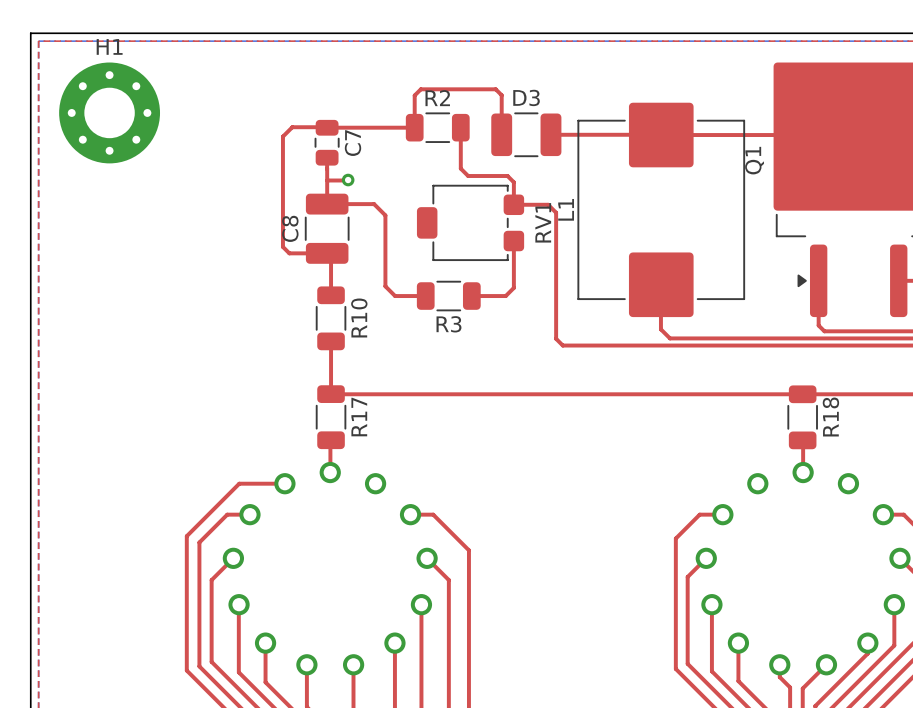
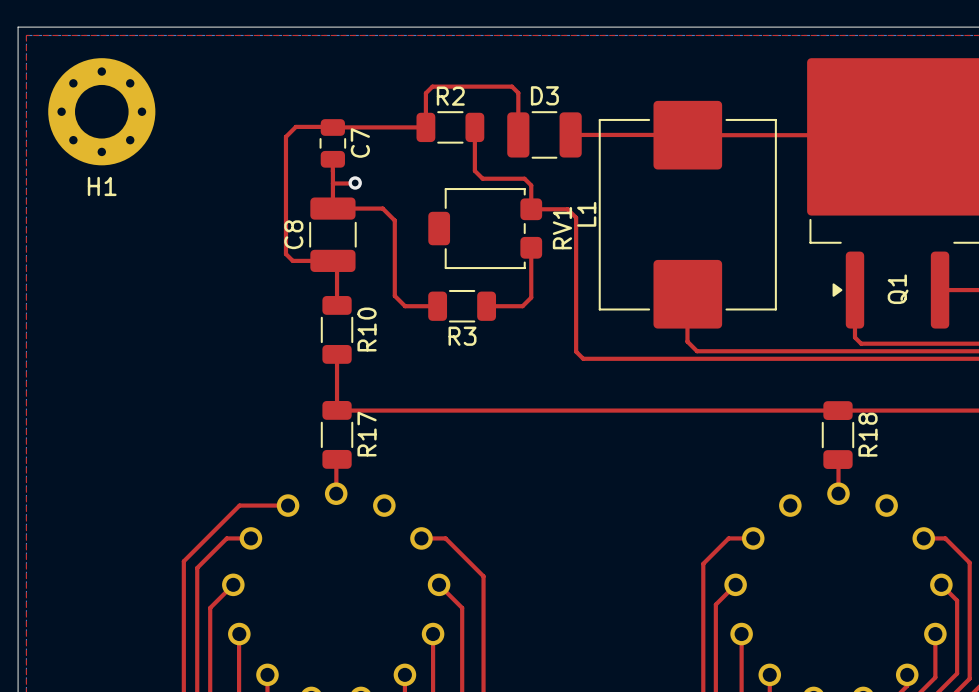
H1 name position: H1 (109, 46) -> H1 (102, 186)
Q1 name position: Q1 (754, 160) -> Q1 (898, 289)

